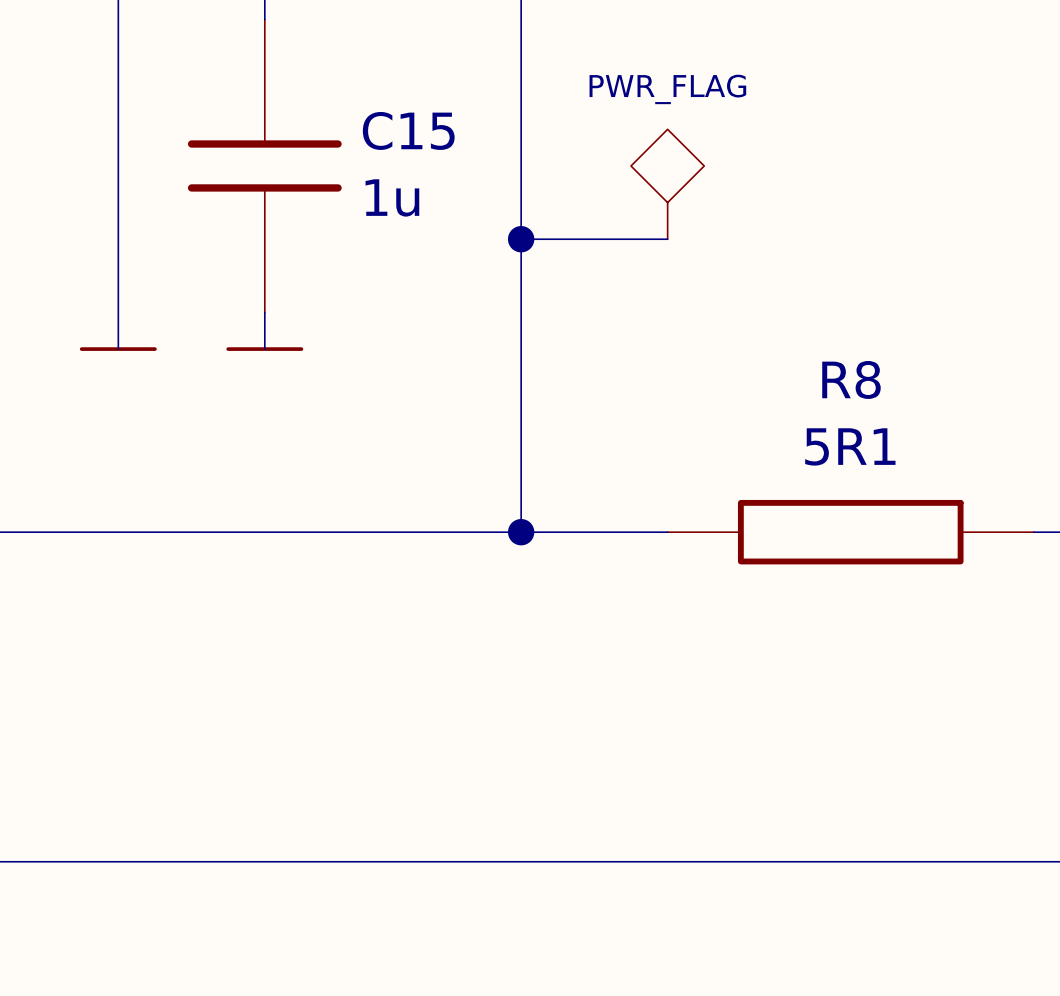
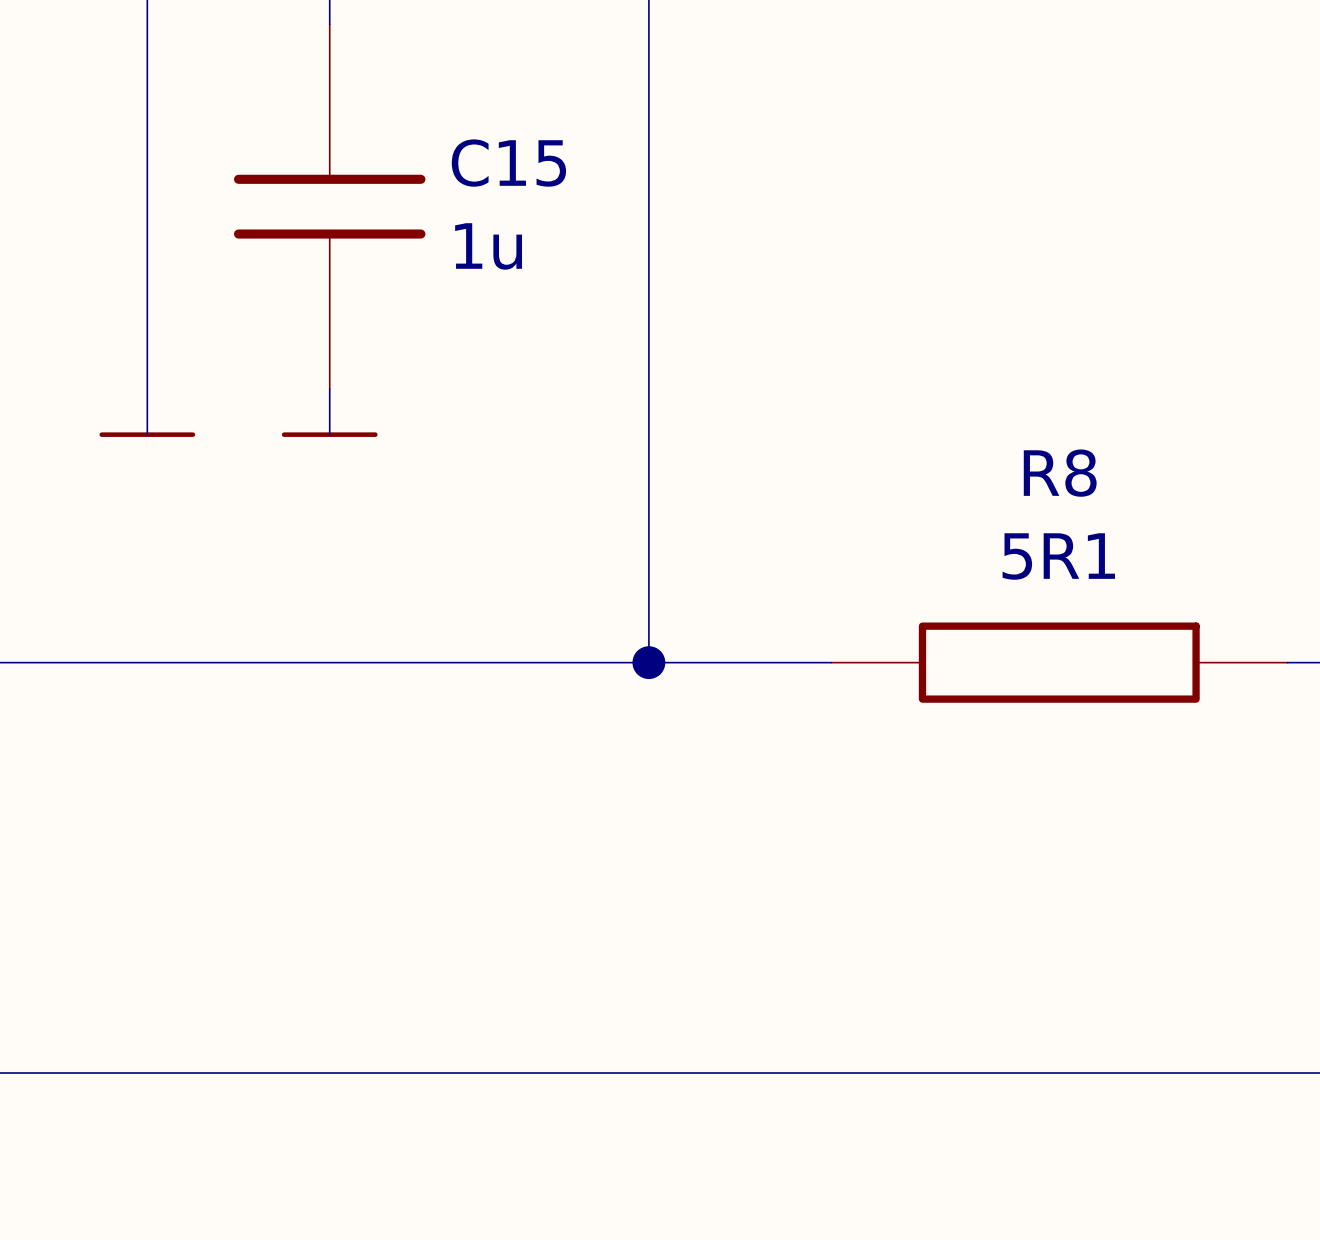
power symbol: PWR_FLAG (667, 184) -> none
wire: (521, 239) (667, 239) -> none
junction: (521, 239) -> none

